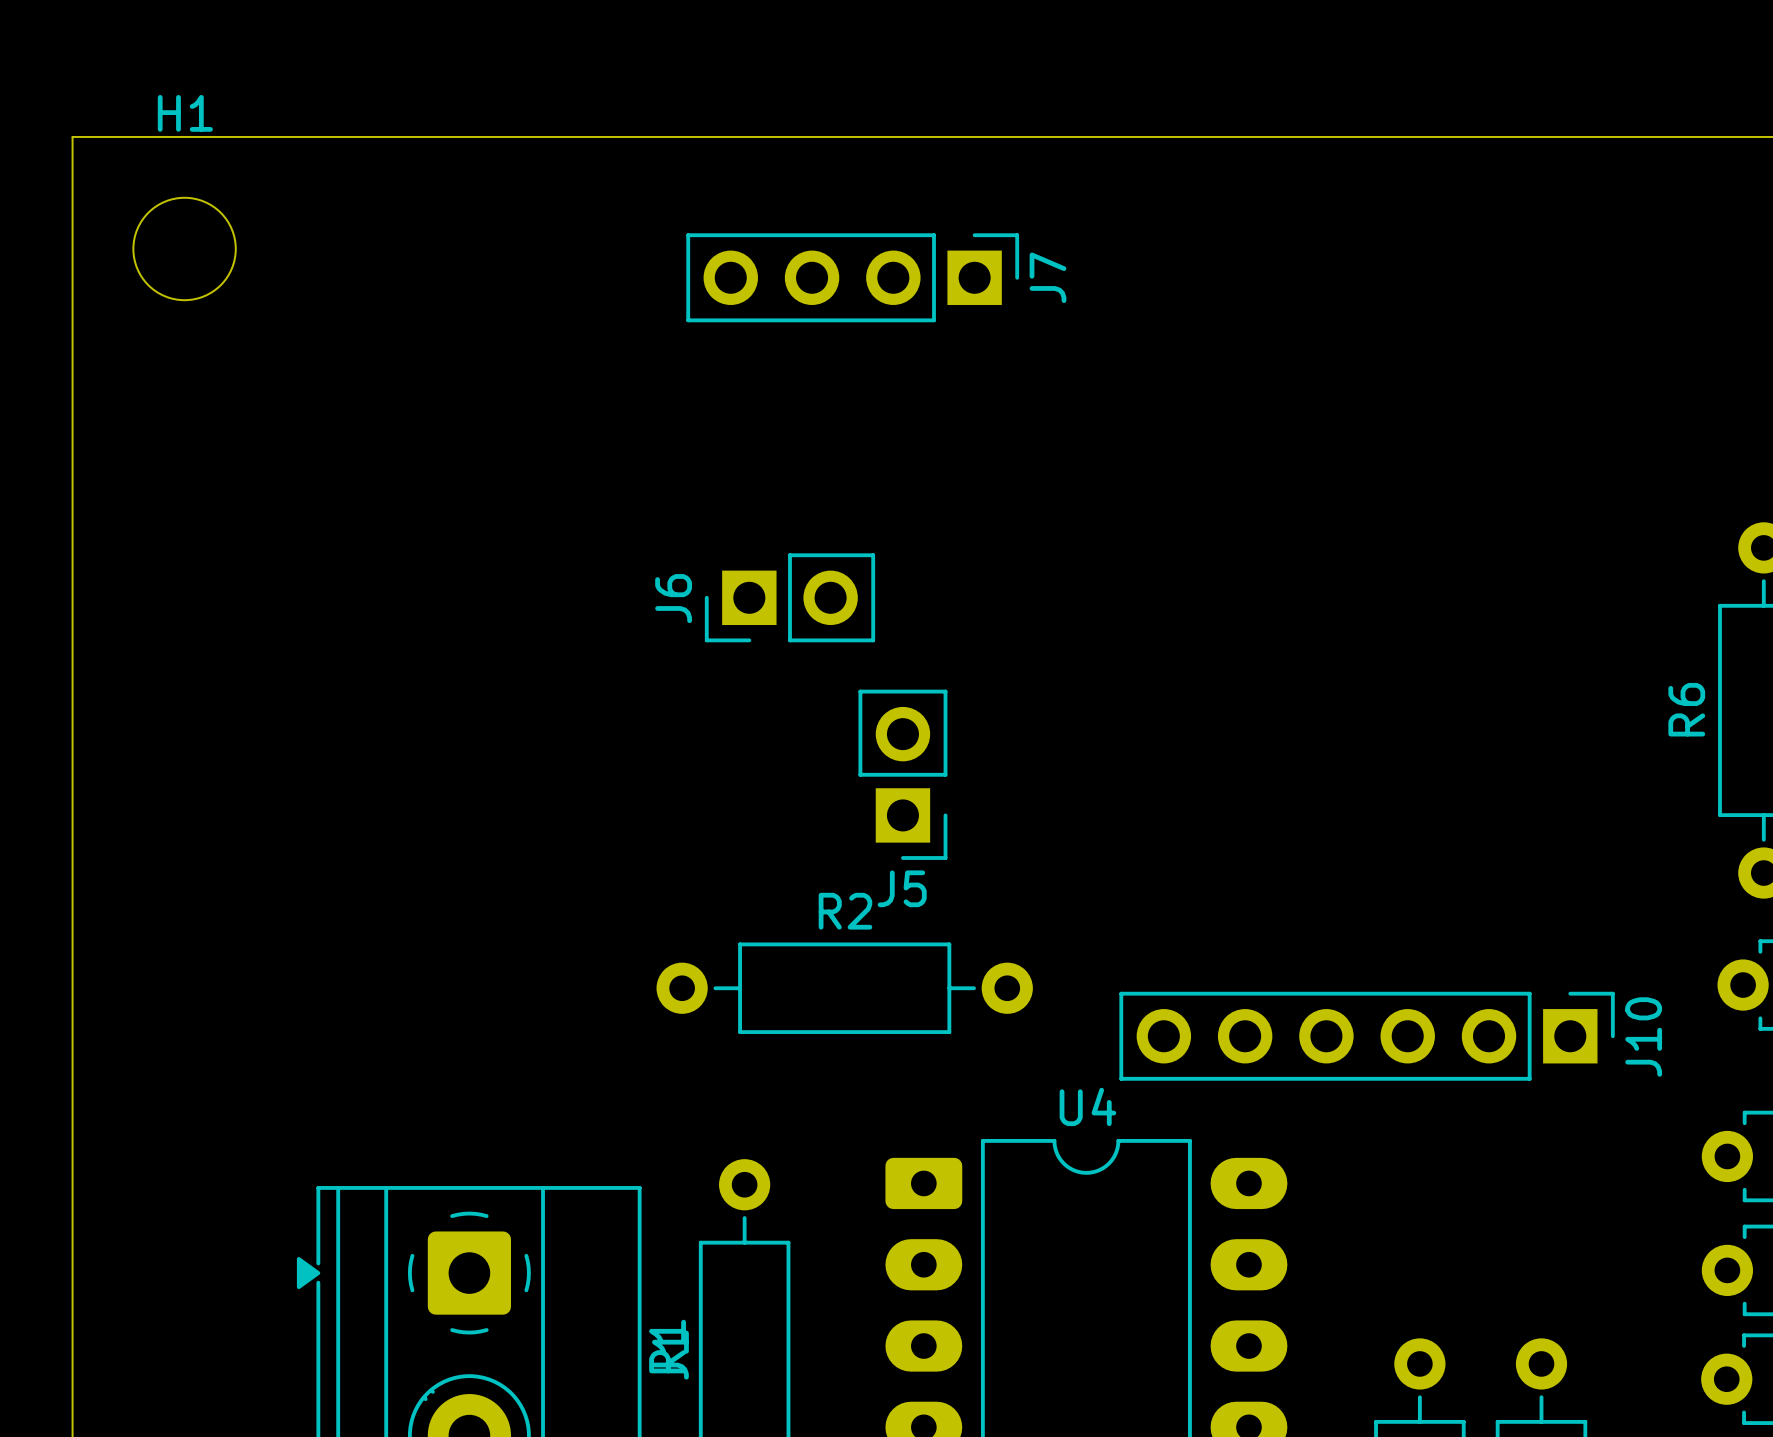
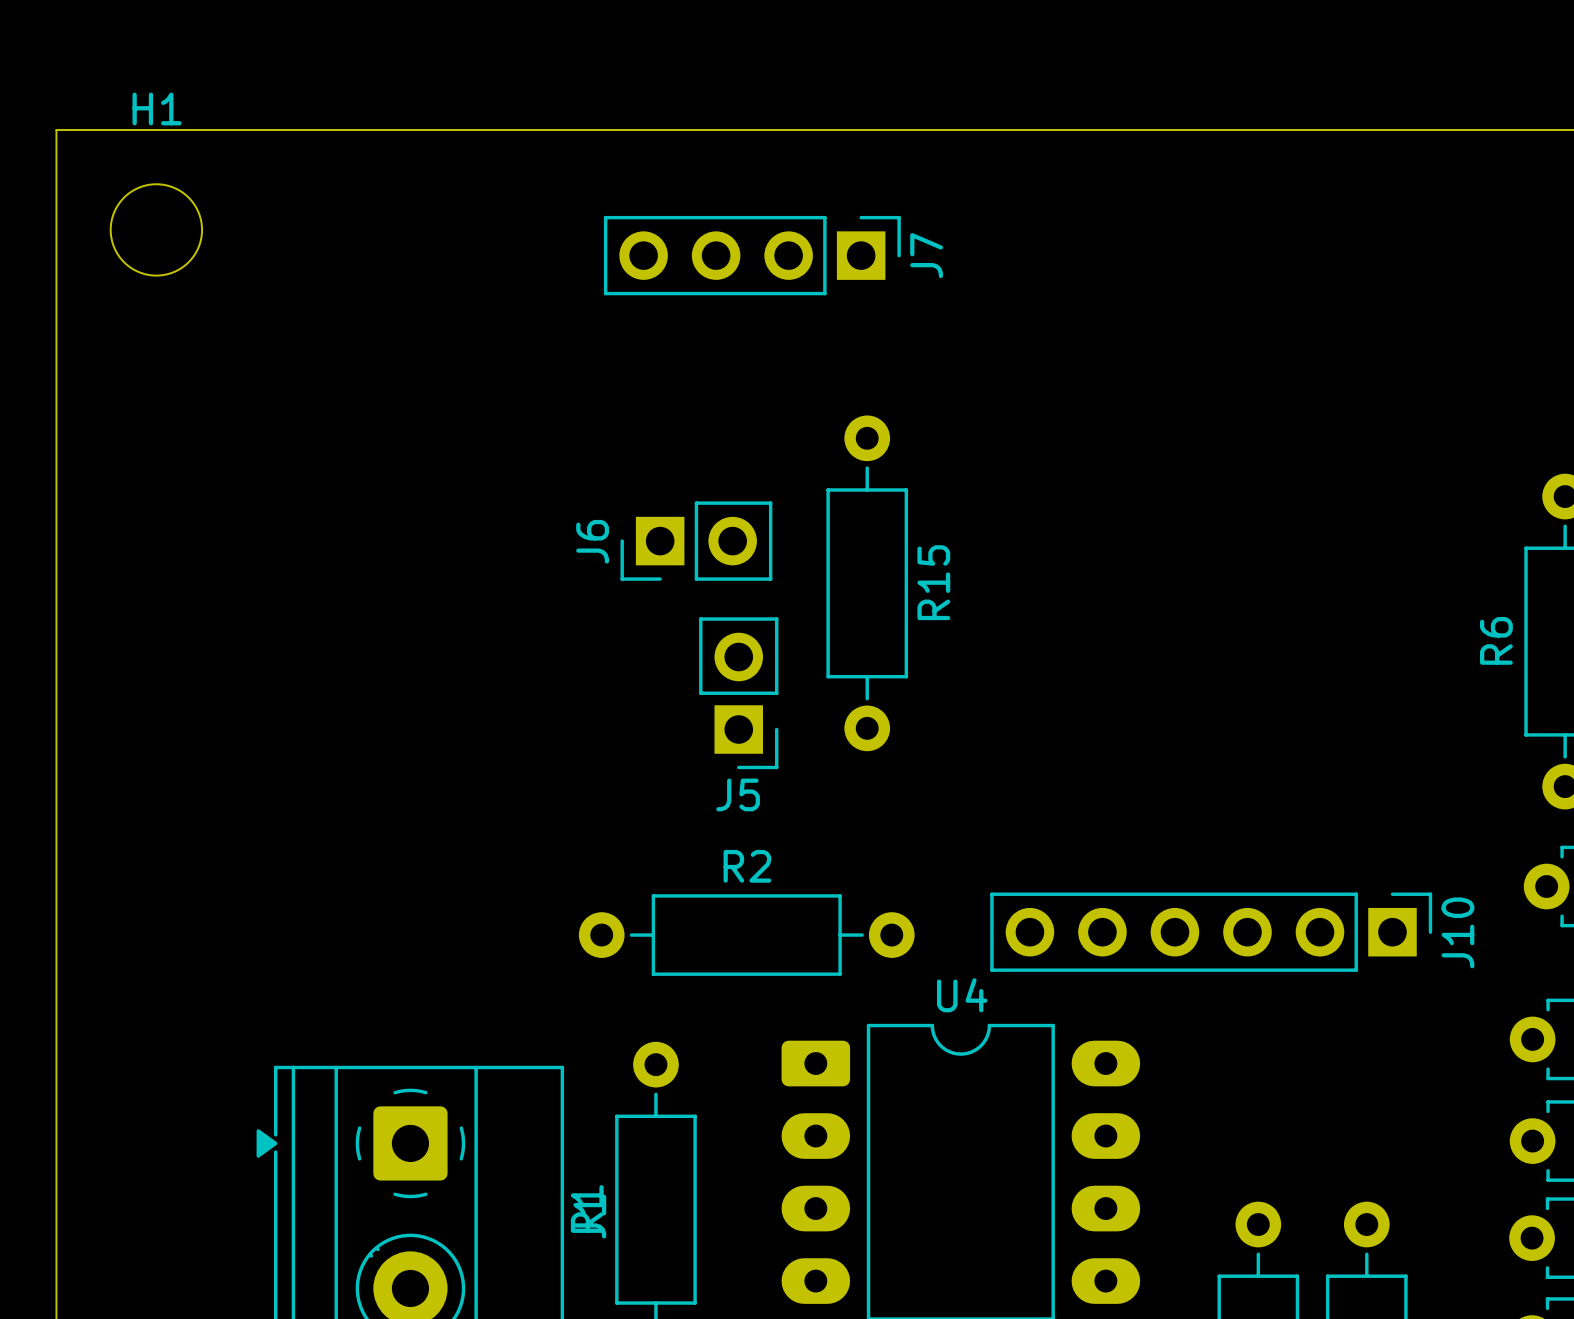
R15: none -> (867, 583)
J5 position: (902, 774) -> (738, 693)
R2 position: (844, 988) -> (746, 935)

